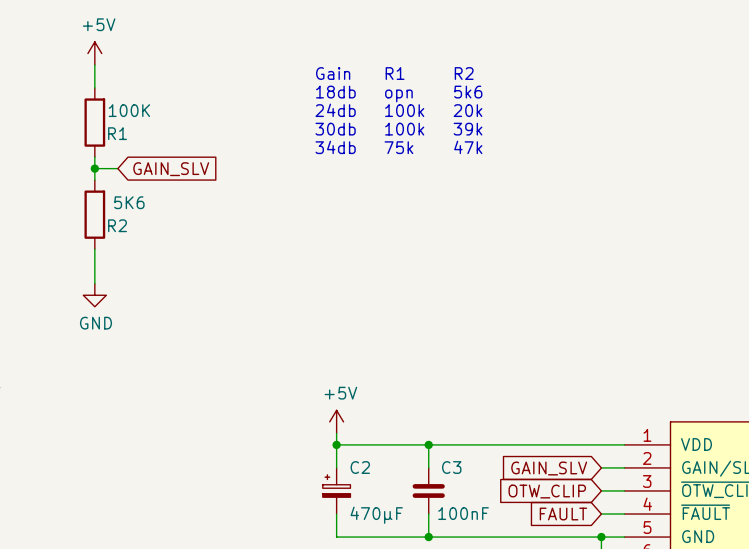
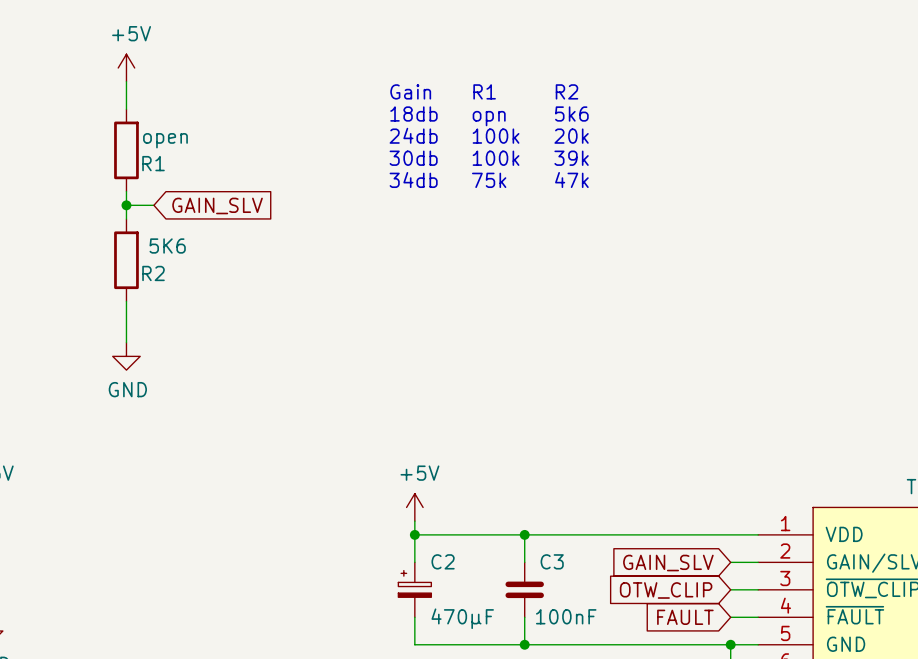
R1 value: 100K (129, 110) -> open (165, 140)

